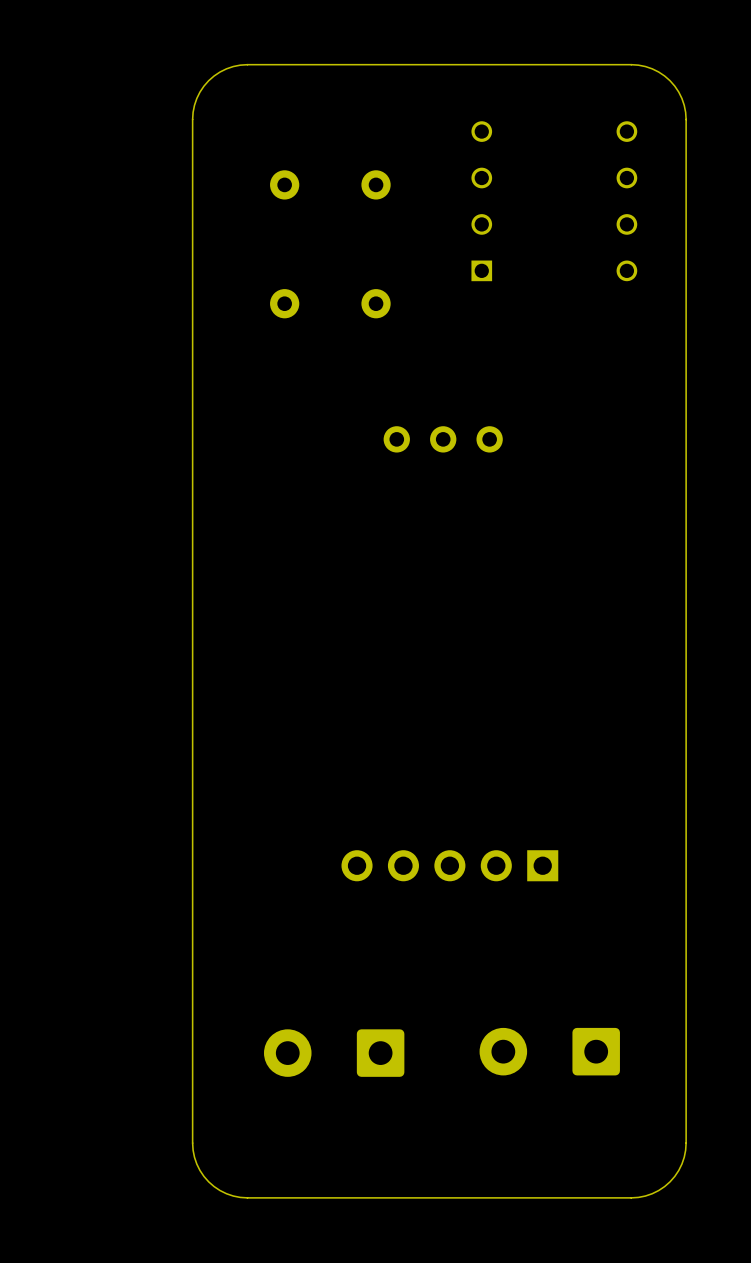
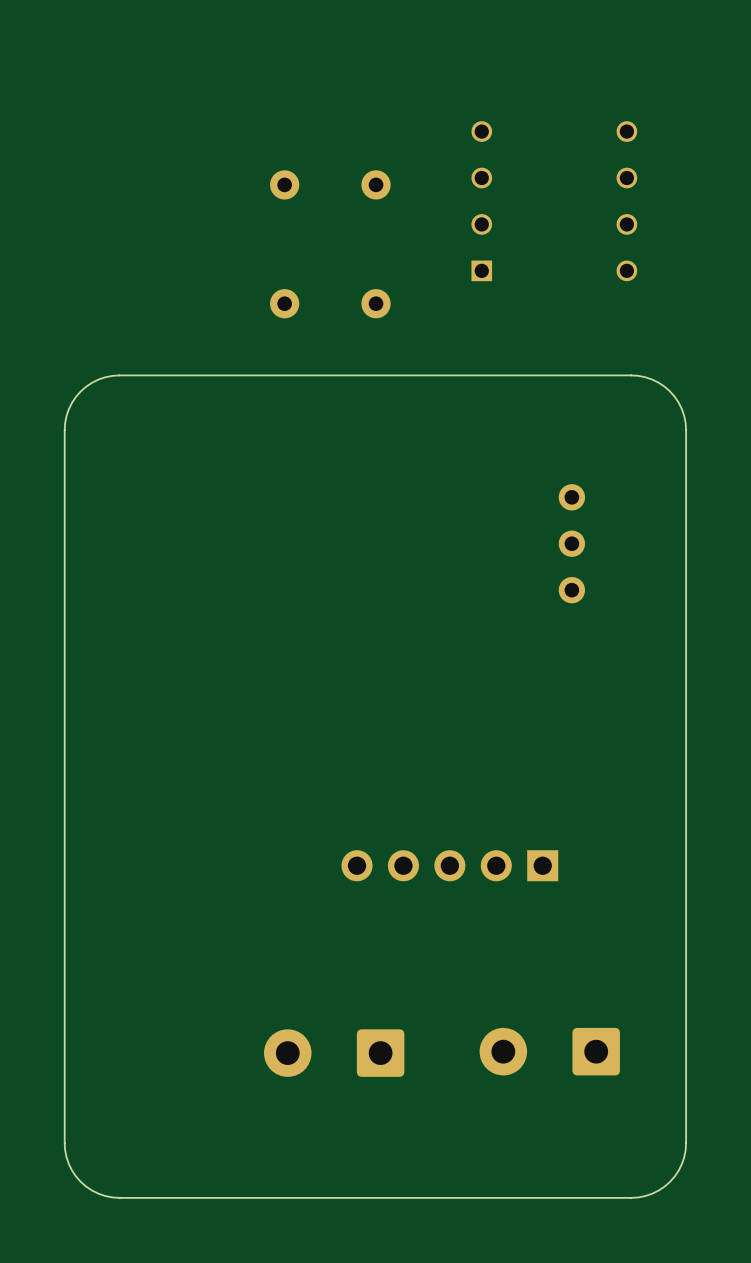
board edge: (686, 430) (686, 119) (681, 98) (674, 86) (664, 76) (652, 68) (631, 64) (247, 64) (233, 66) (220, 72) (203, 86) (194, 105) (192, 119) (192, 1143) (196, 1164) (208, 1181) (226, 1193) (247, 1197) -> (686, 430) (681, 409) (670, 391) (652, 379) (631, 375) (119, 375) (105, 377) (92, 382) (80, 391) (72, 402) (66, 416) (64, 430) (64, 1143) (66, 1157) (72, 1170) (80, 1181) (92, 1190) (105, 1196) (119, 1197) (247, 1197)
part rotation: 0° (443, 439) -> 90° clockwise (571, 543)
part position: (443, 439) -> (571, 543)

